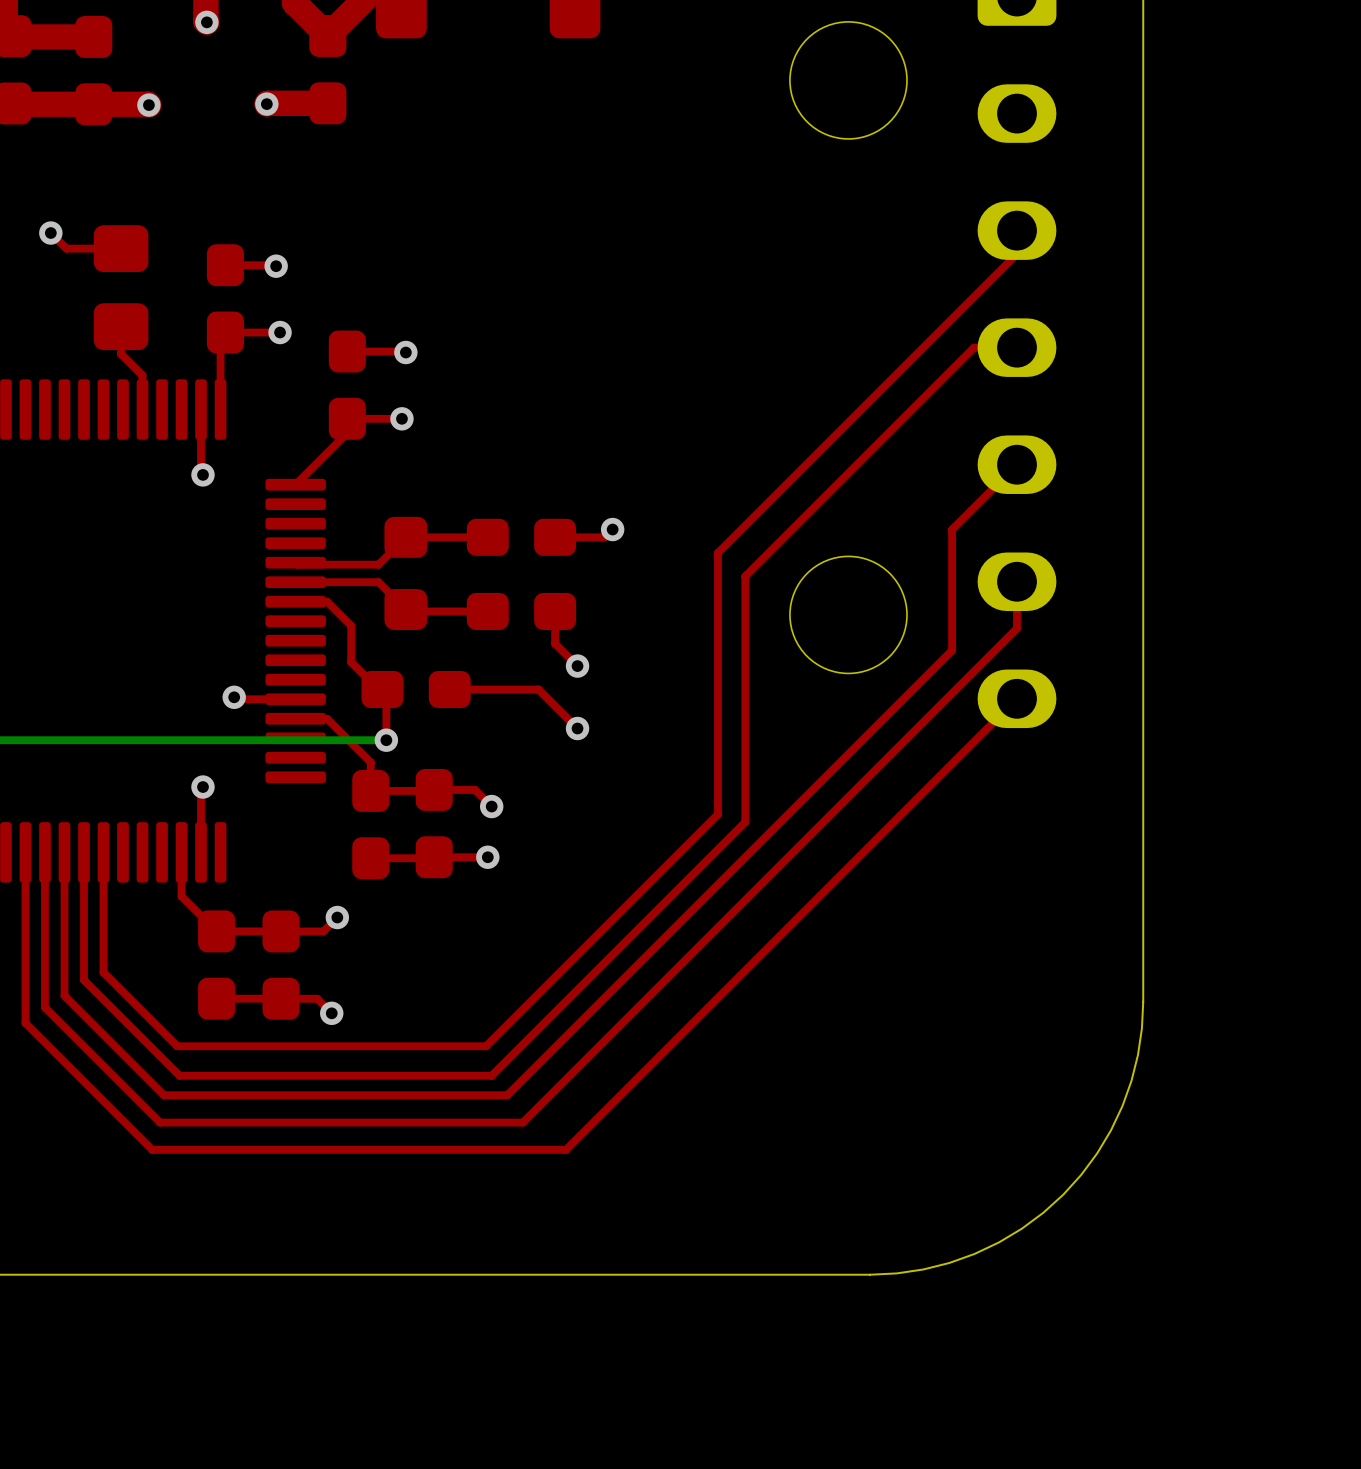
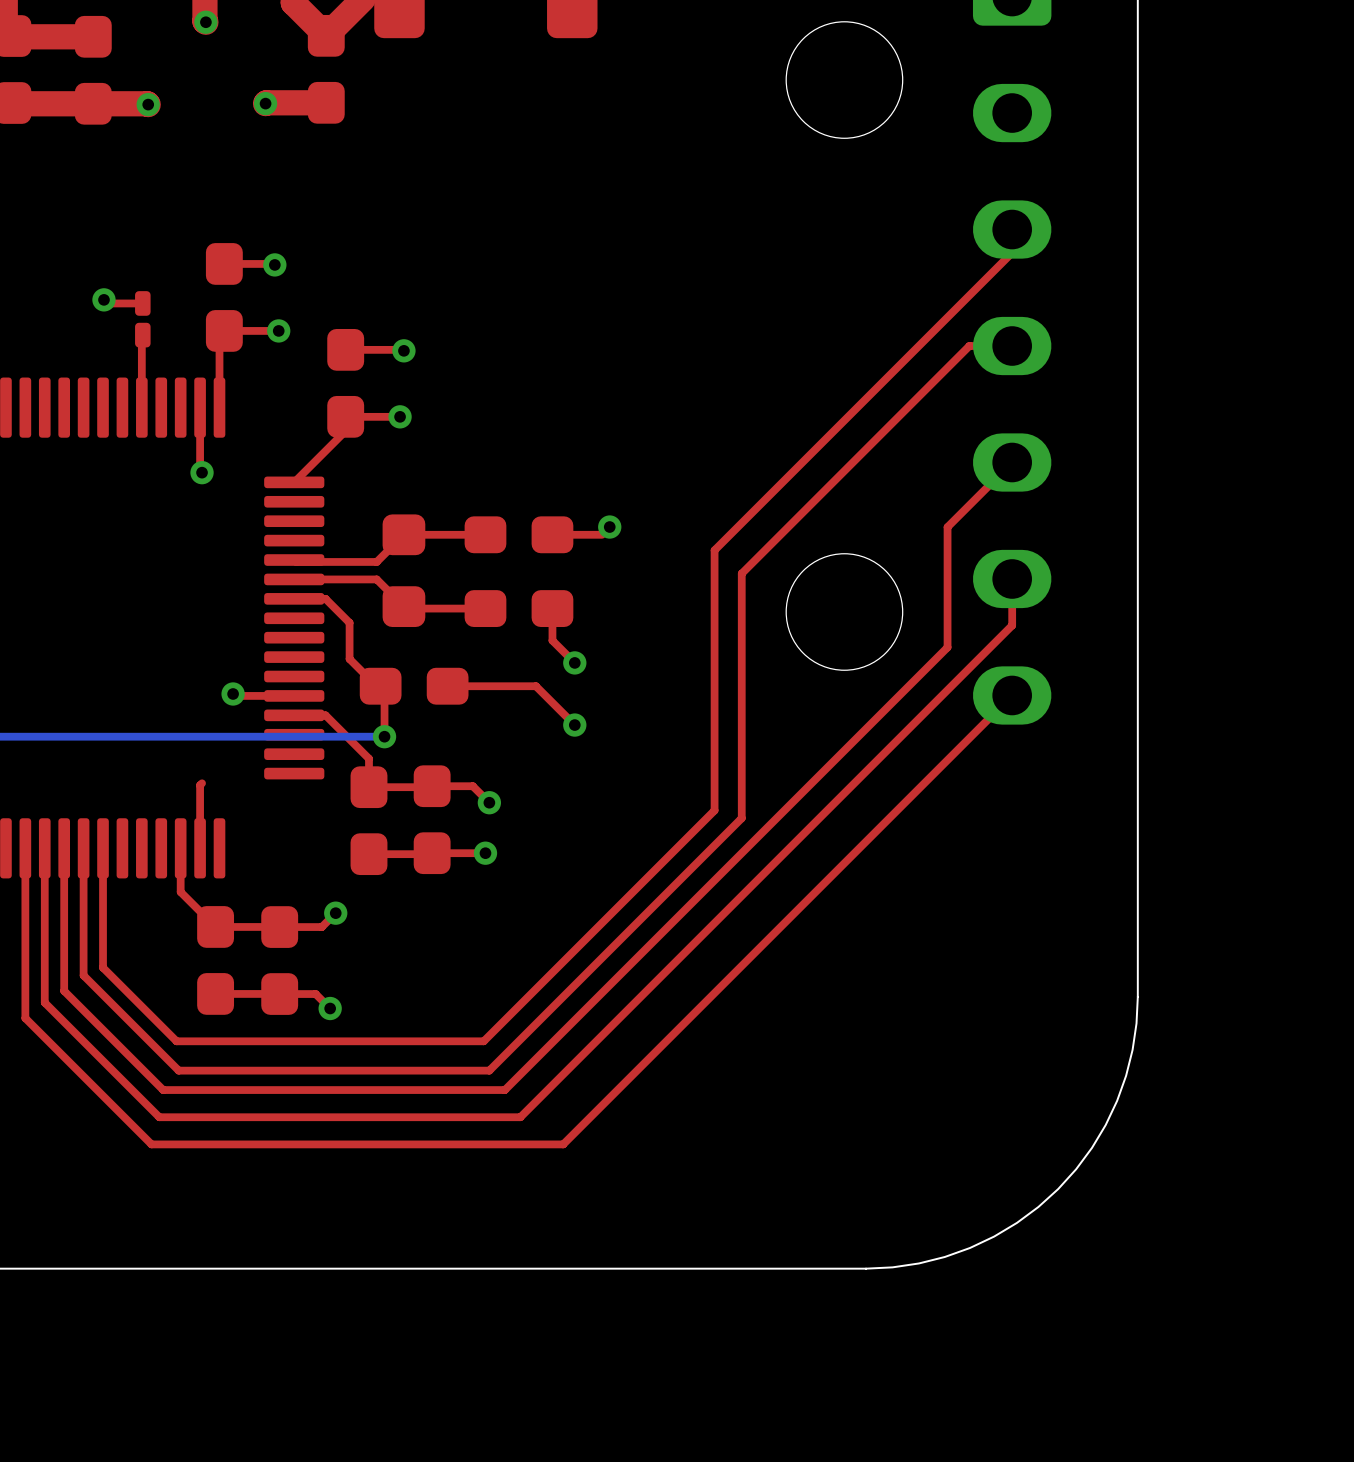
top track: (50, 233) (66, 248) (121, 248) -> none
via position: (50, 233) -> (103, 299)
part: (121, 287) -> none
top track: none -> (103, 299) (107, 303) (142, 303)
part: none -> (142, 319)
top track: (121, 326) (121, 353) (142, 375) -> (142, 335) (141, 373)
via: (202, 787) -> none

